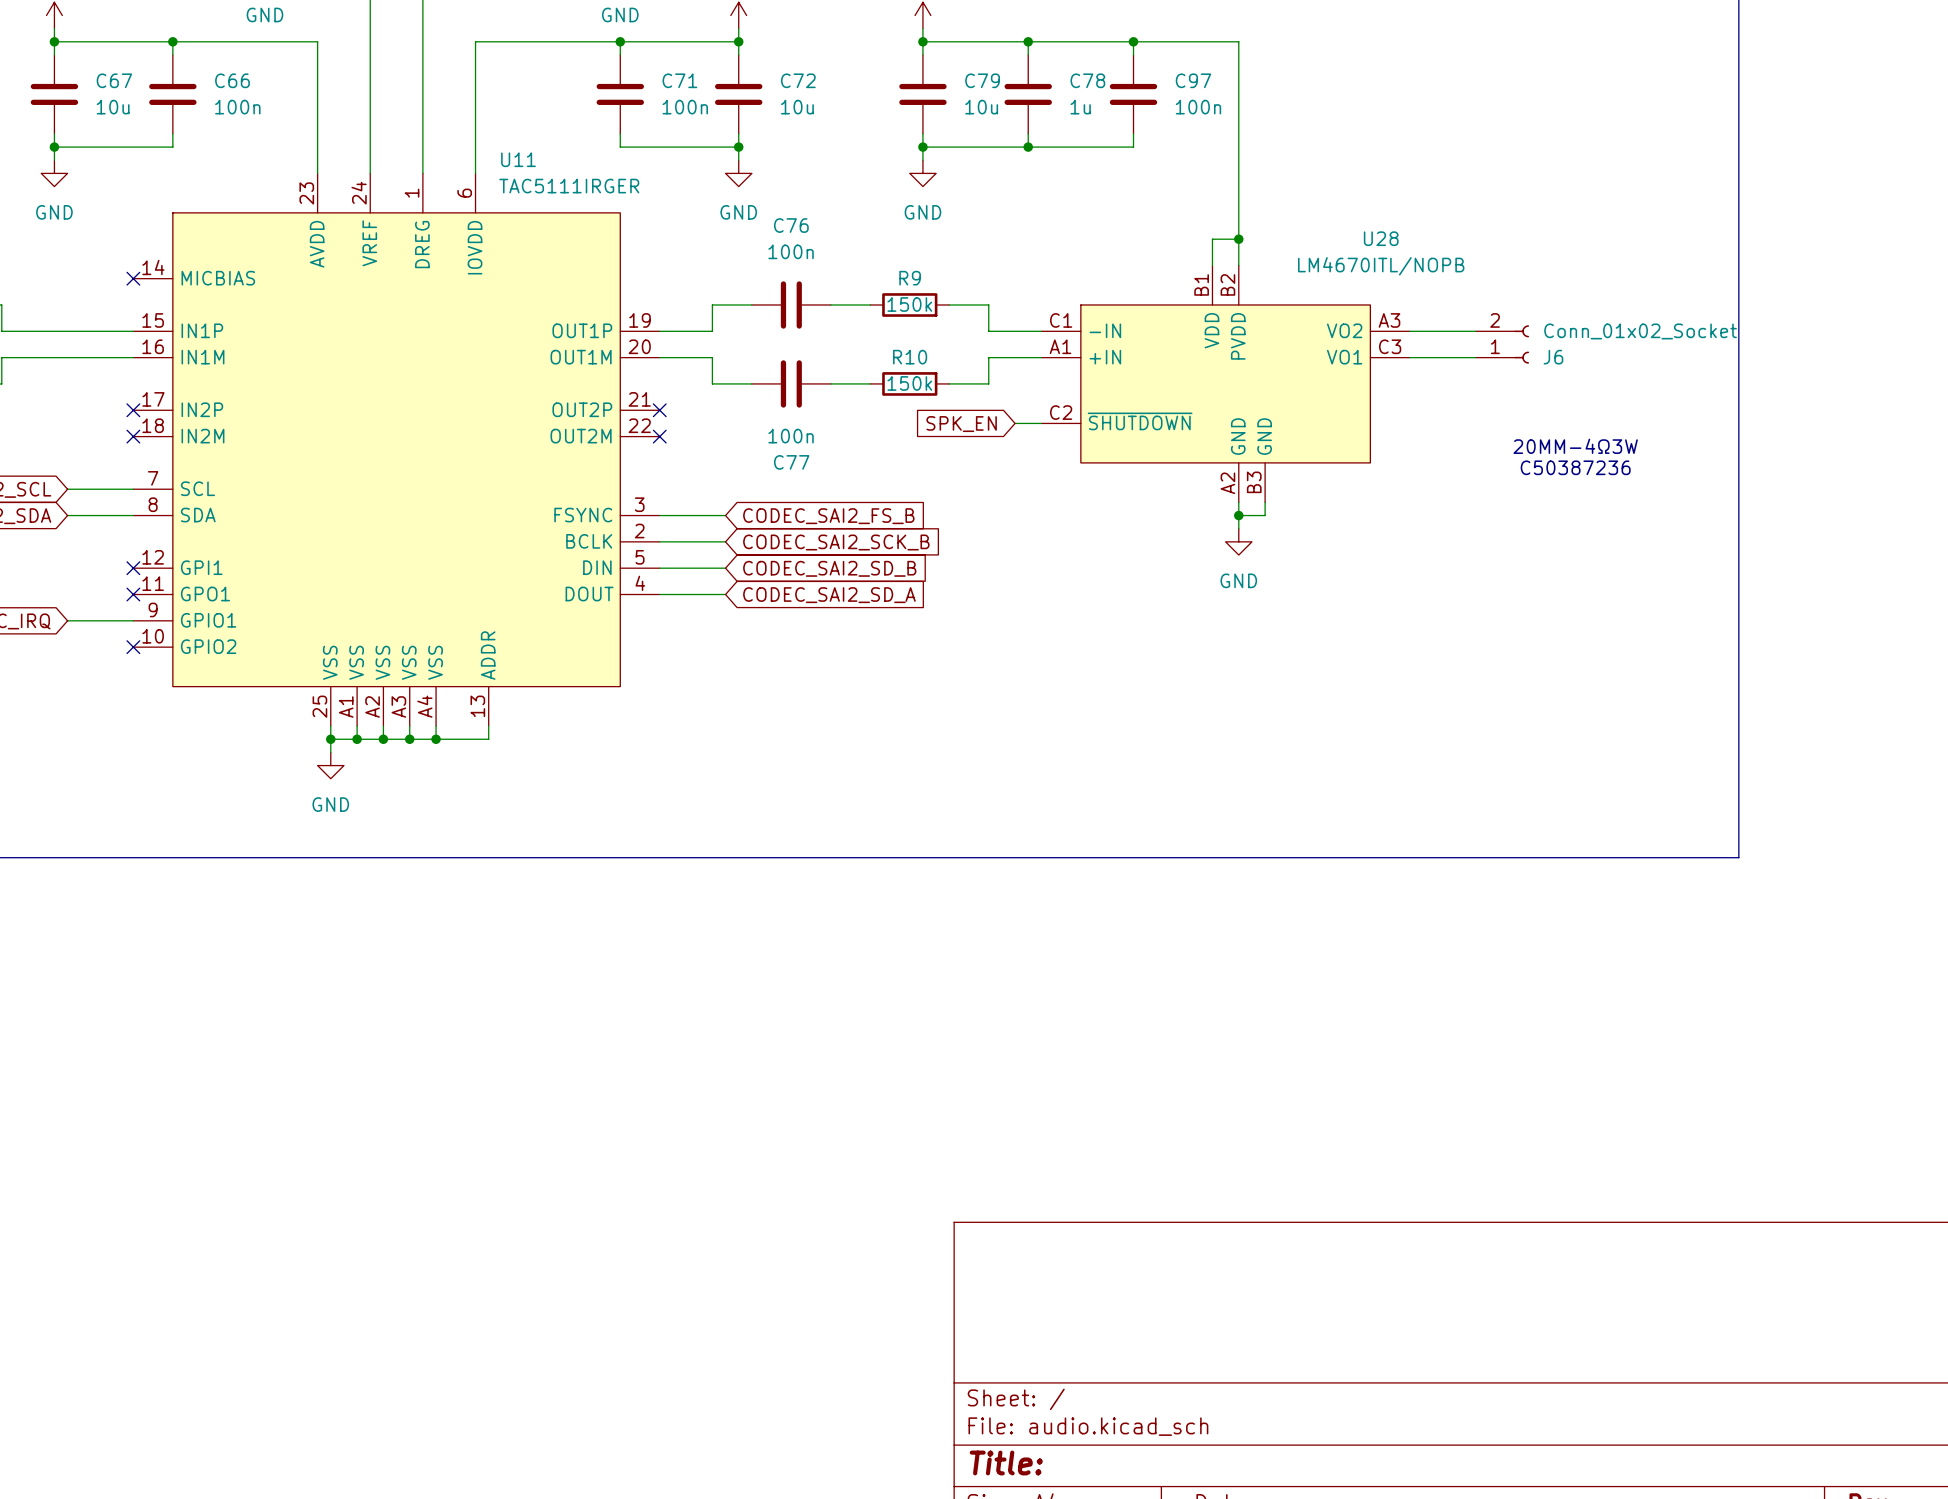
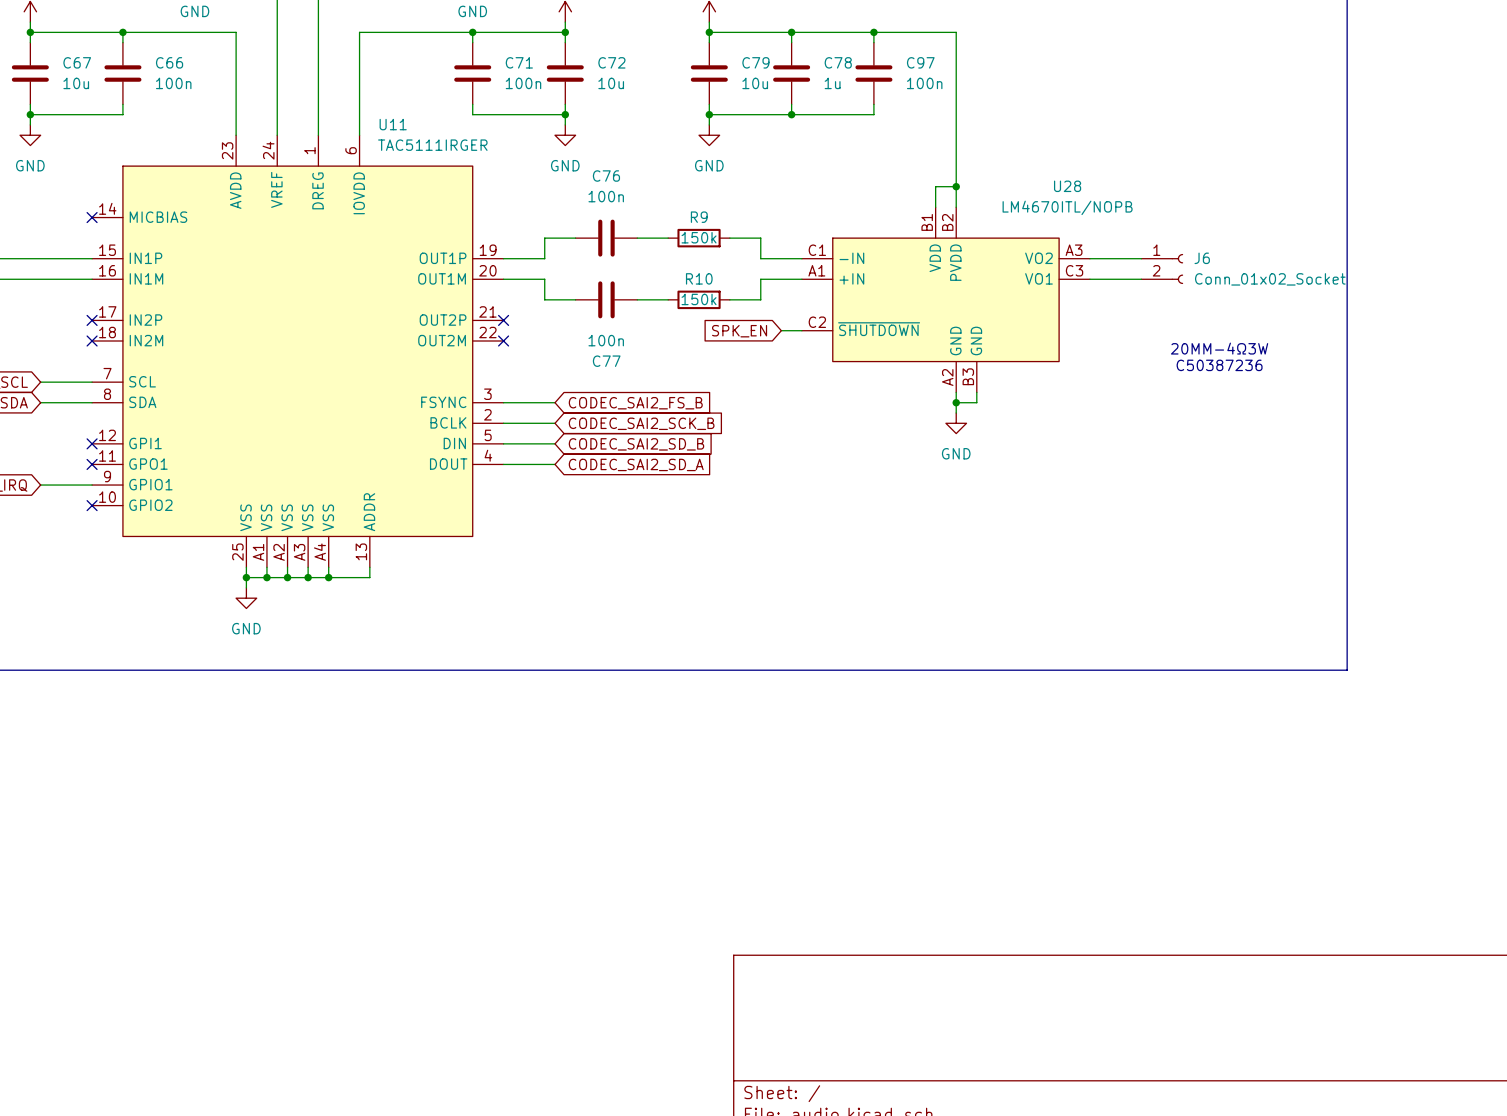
J6 flip: as is (1521, 344) -> up-down (1177, 268)

